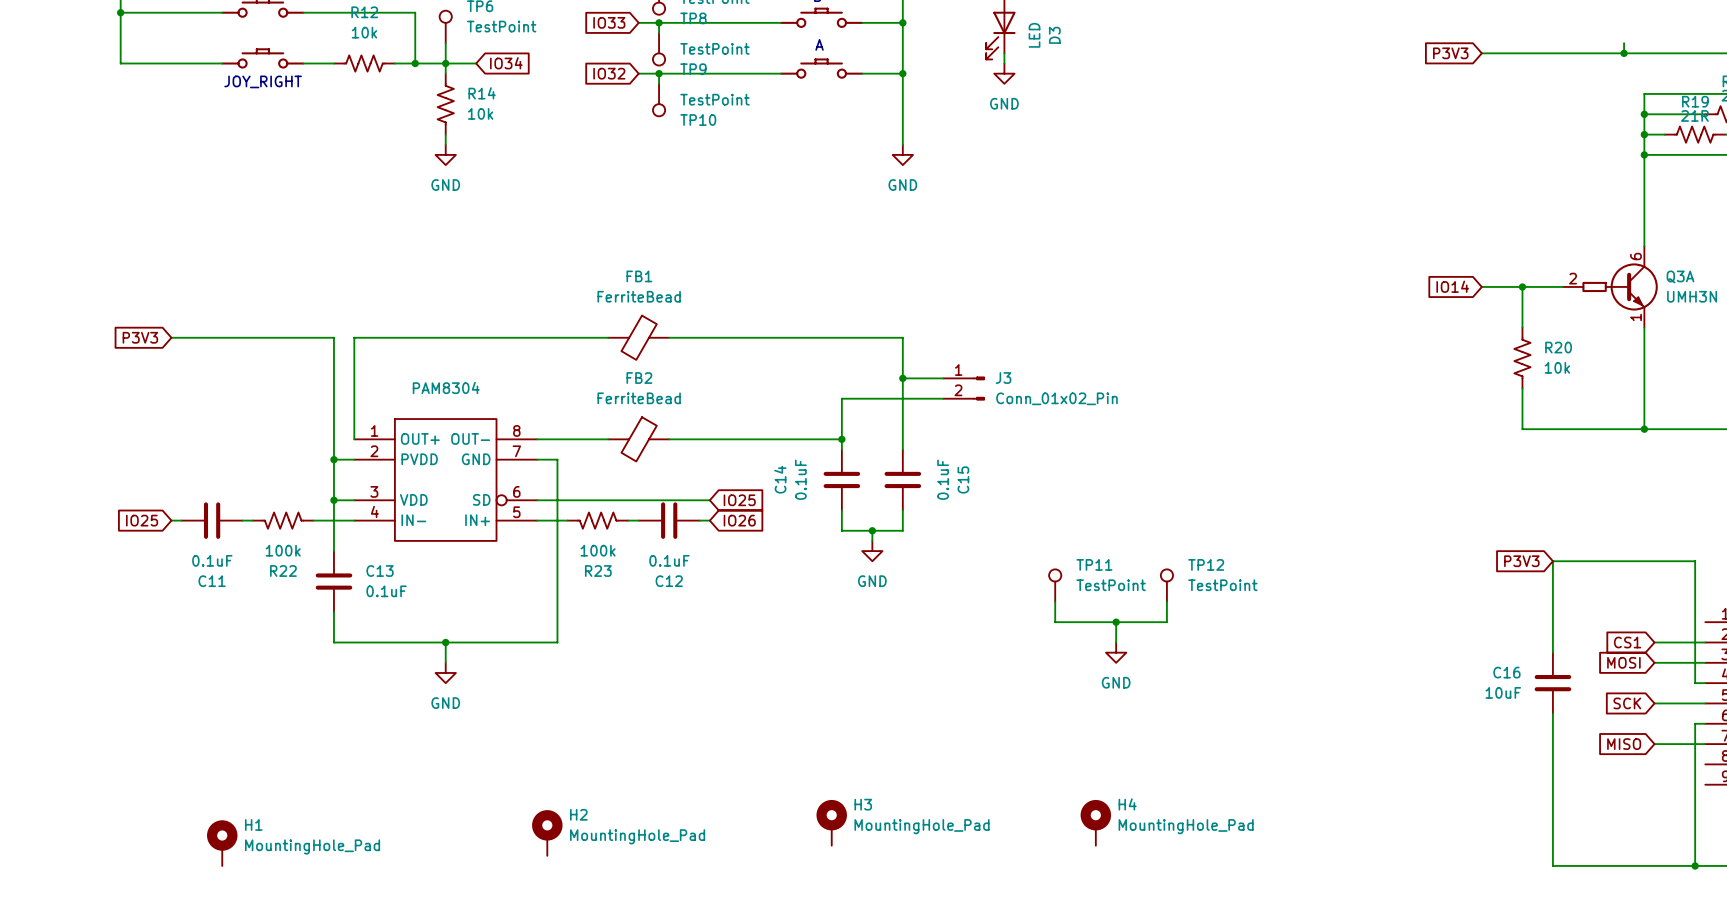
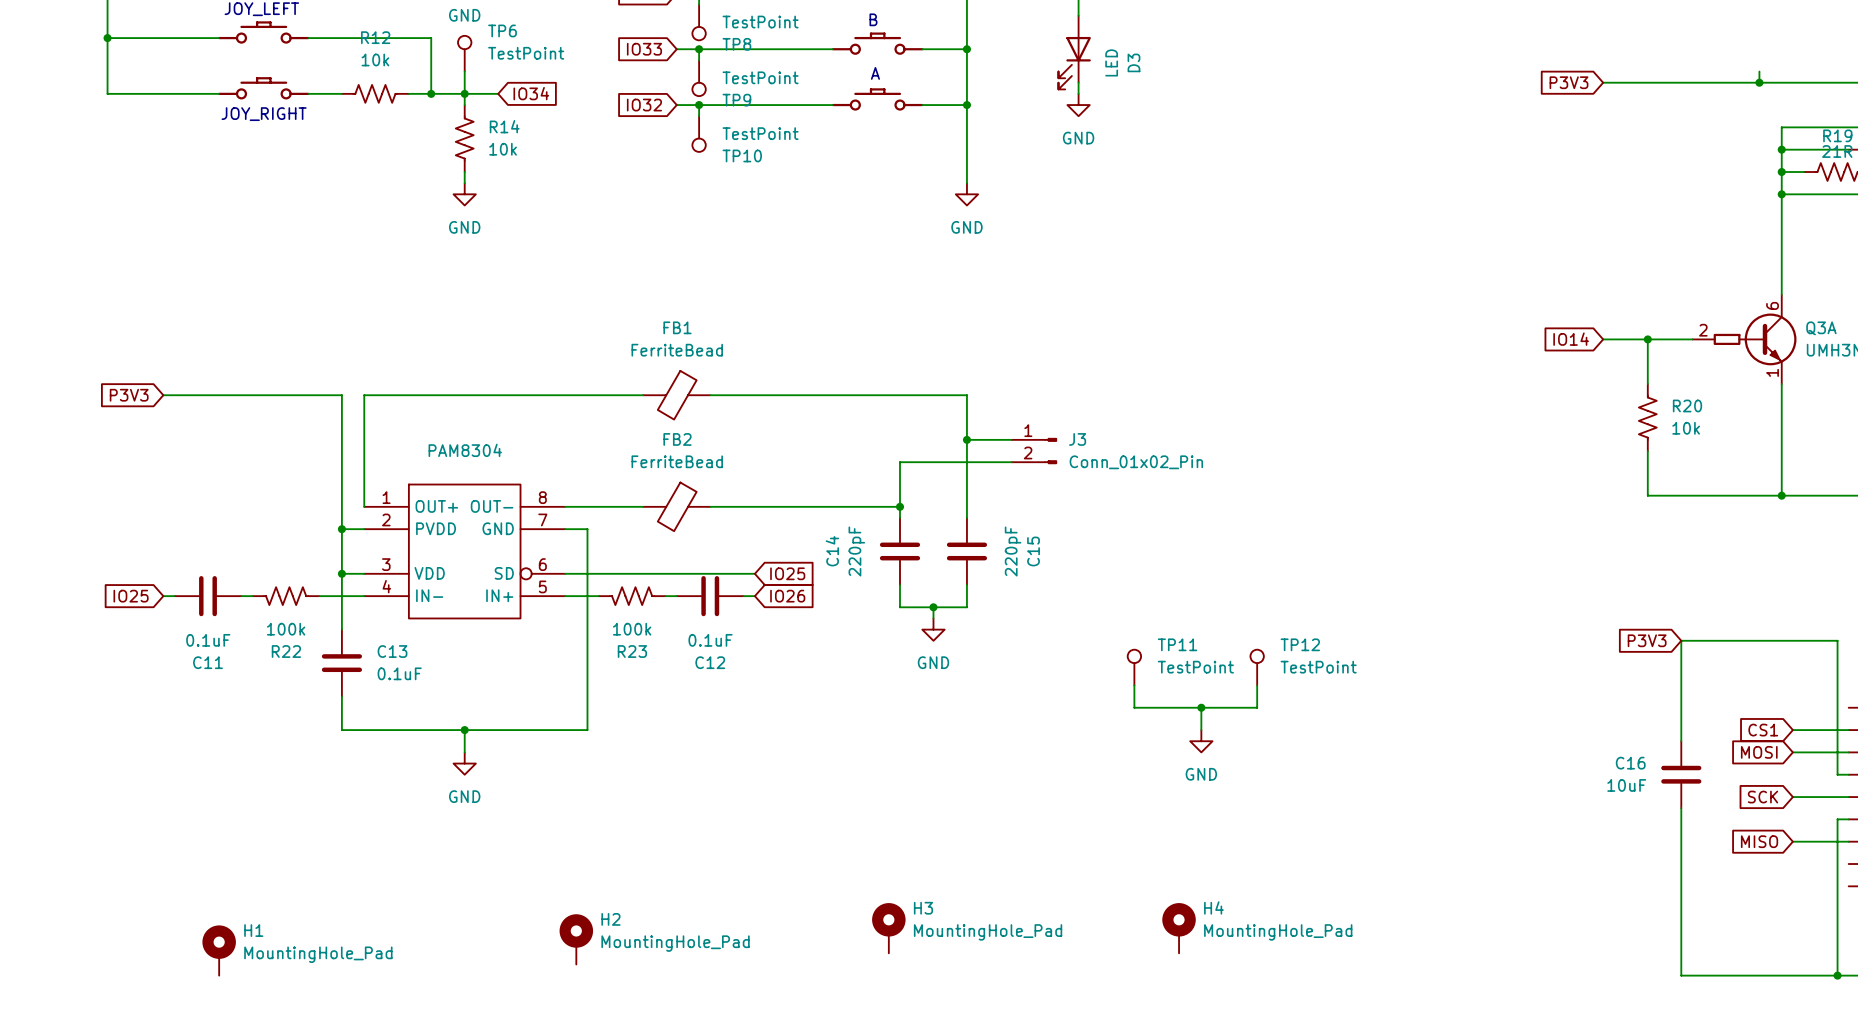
C14 value: 0.1uF (800, 479) -> 220pF (856, 551)
C15 value: 0.1uF (943, 479) -> 220pF (1013, 551)

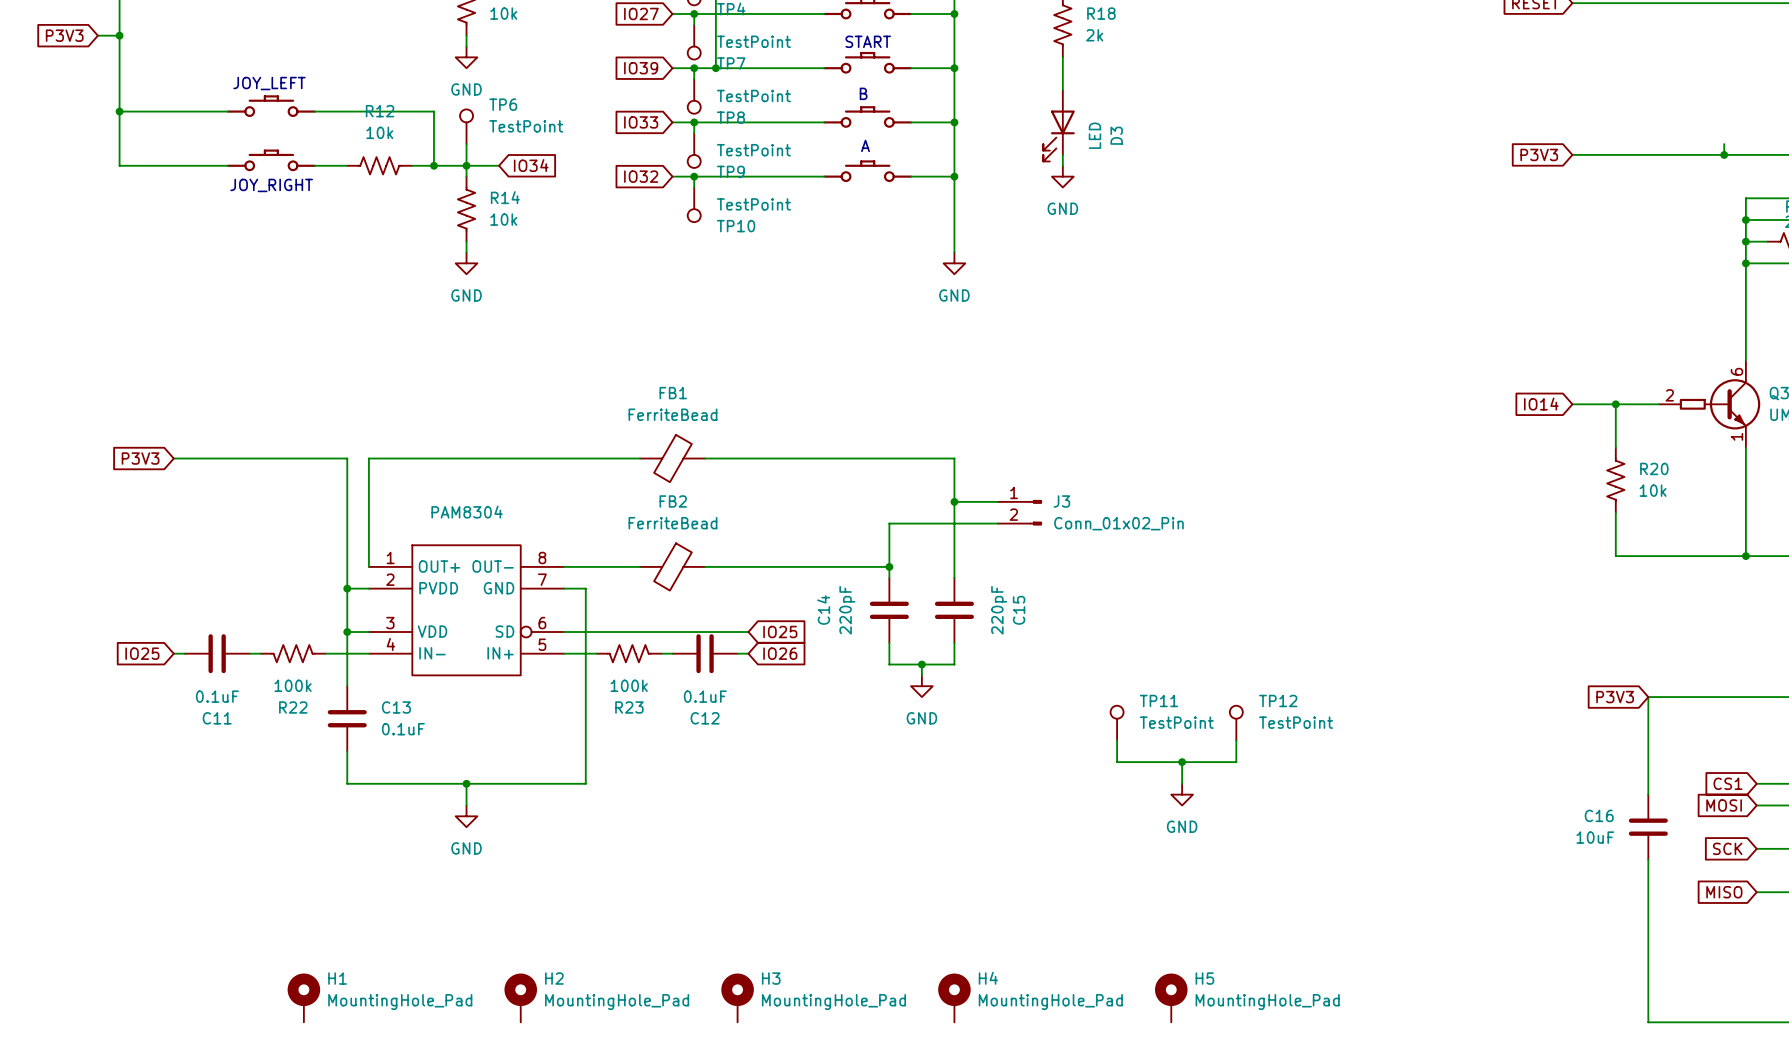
H3 position: (888, 928) -> (737, 997)
H4 position: (1179, 928) -> (954, 997)
H2 position: (576, 939) -> (520, 997)
H1 position: (219, 950) -> (303, 997)
H5: none -> MountingHole_Pad (1171, 997)

